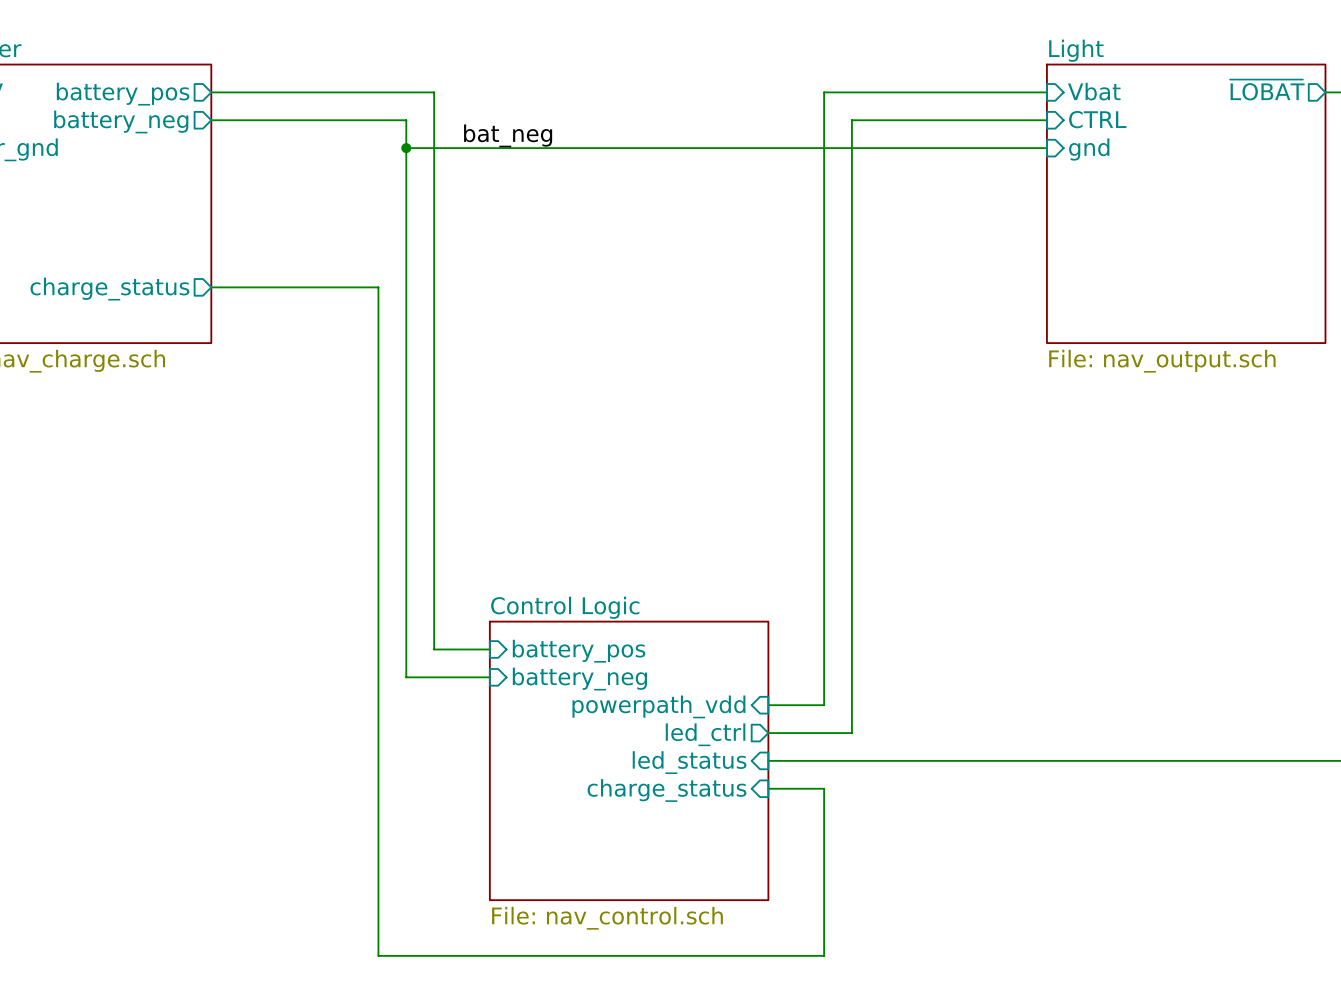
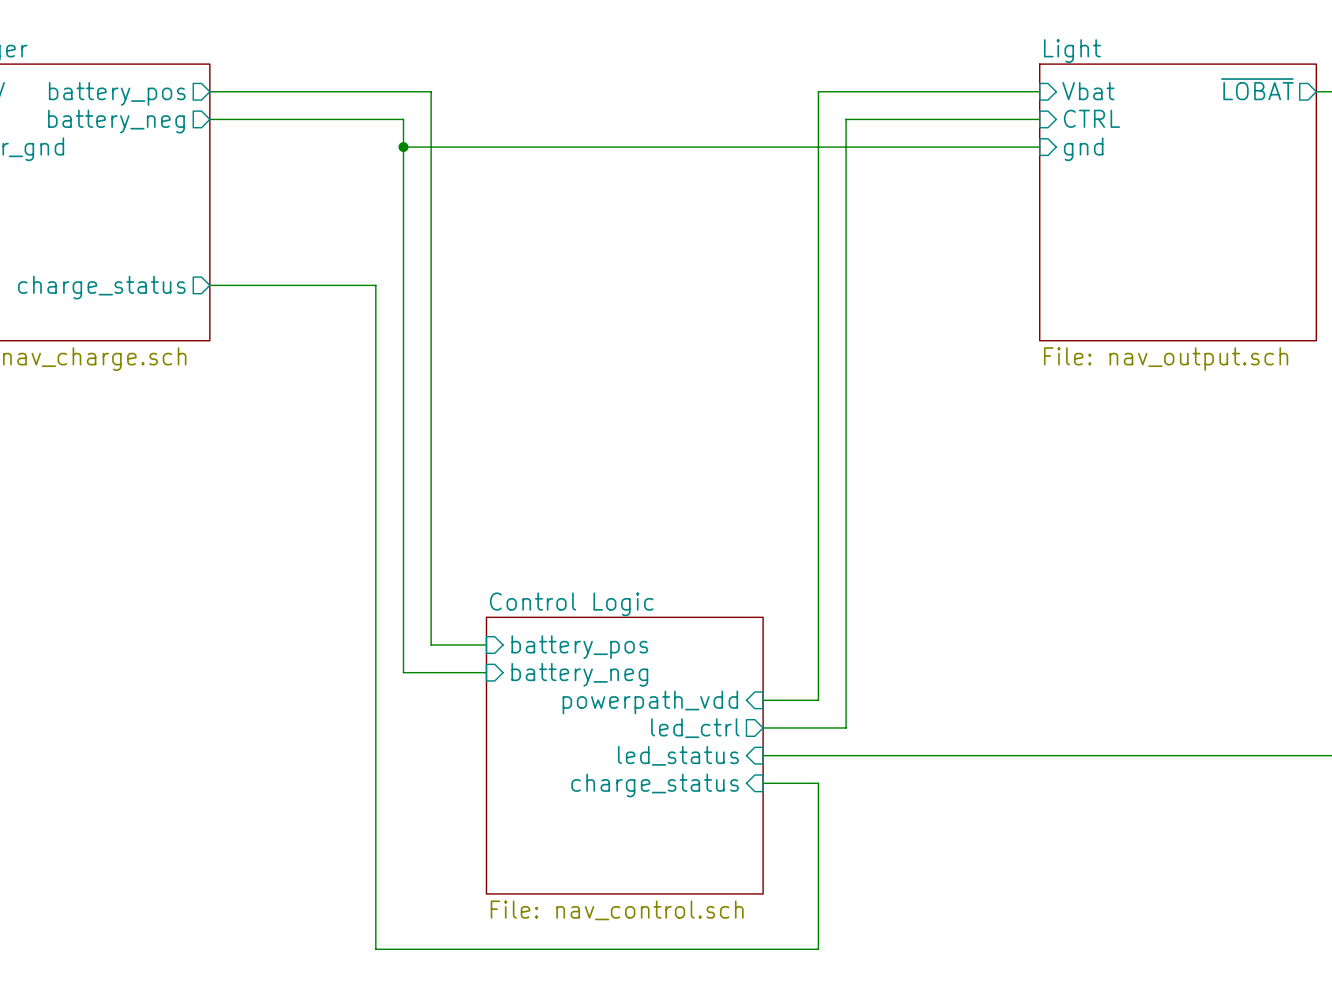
label: bat_neg (508, 135) -> none

